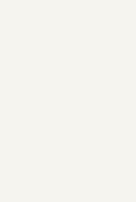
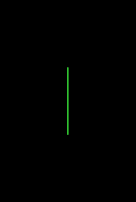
wire: none -> (67, 67) (67, 134)

